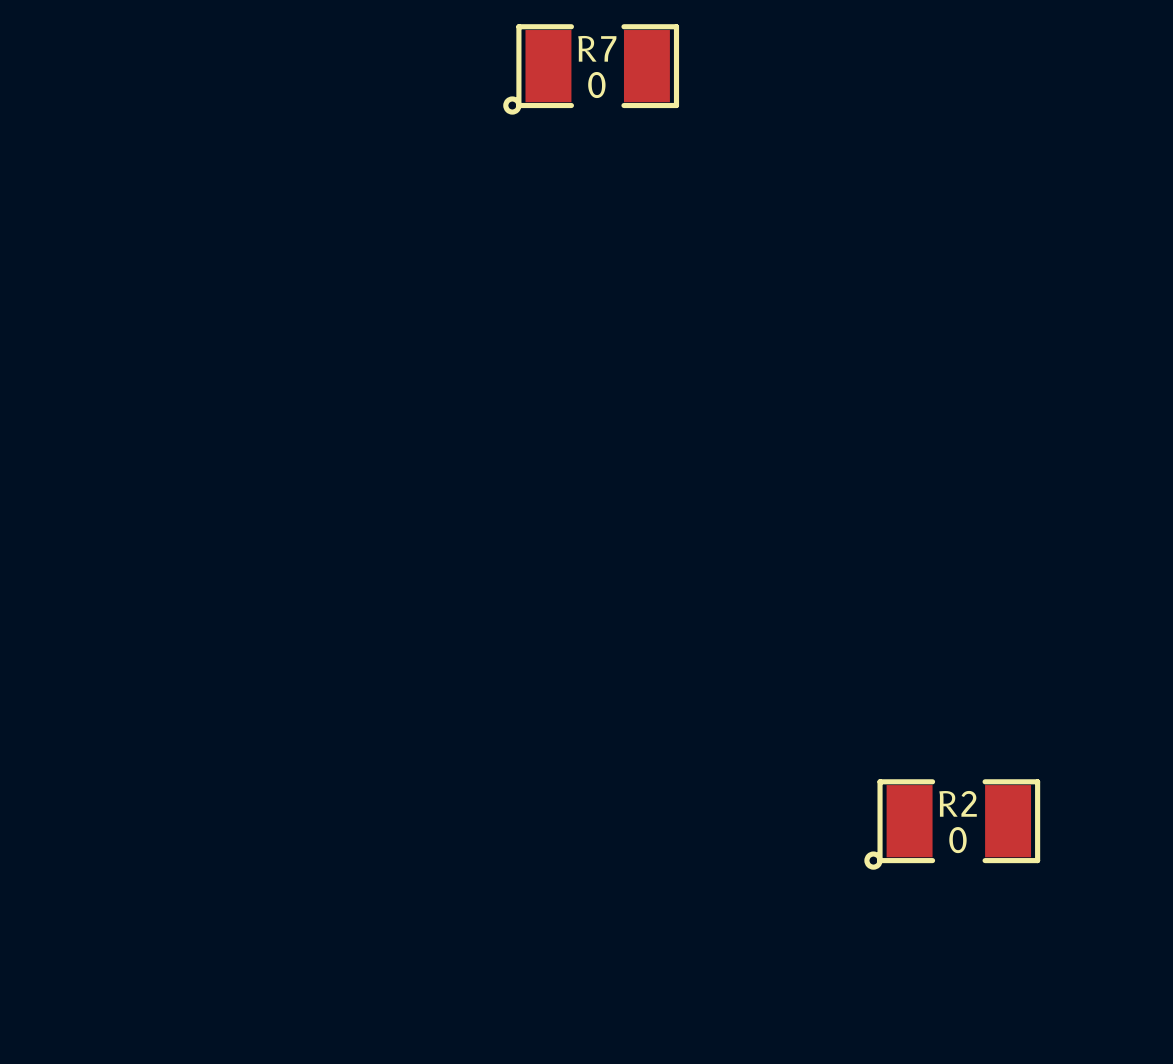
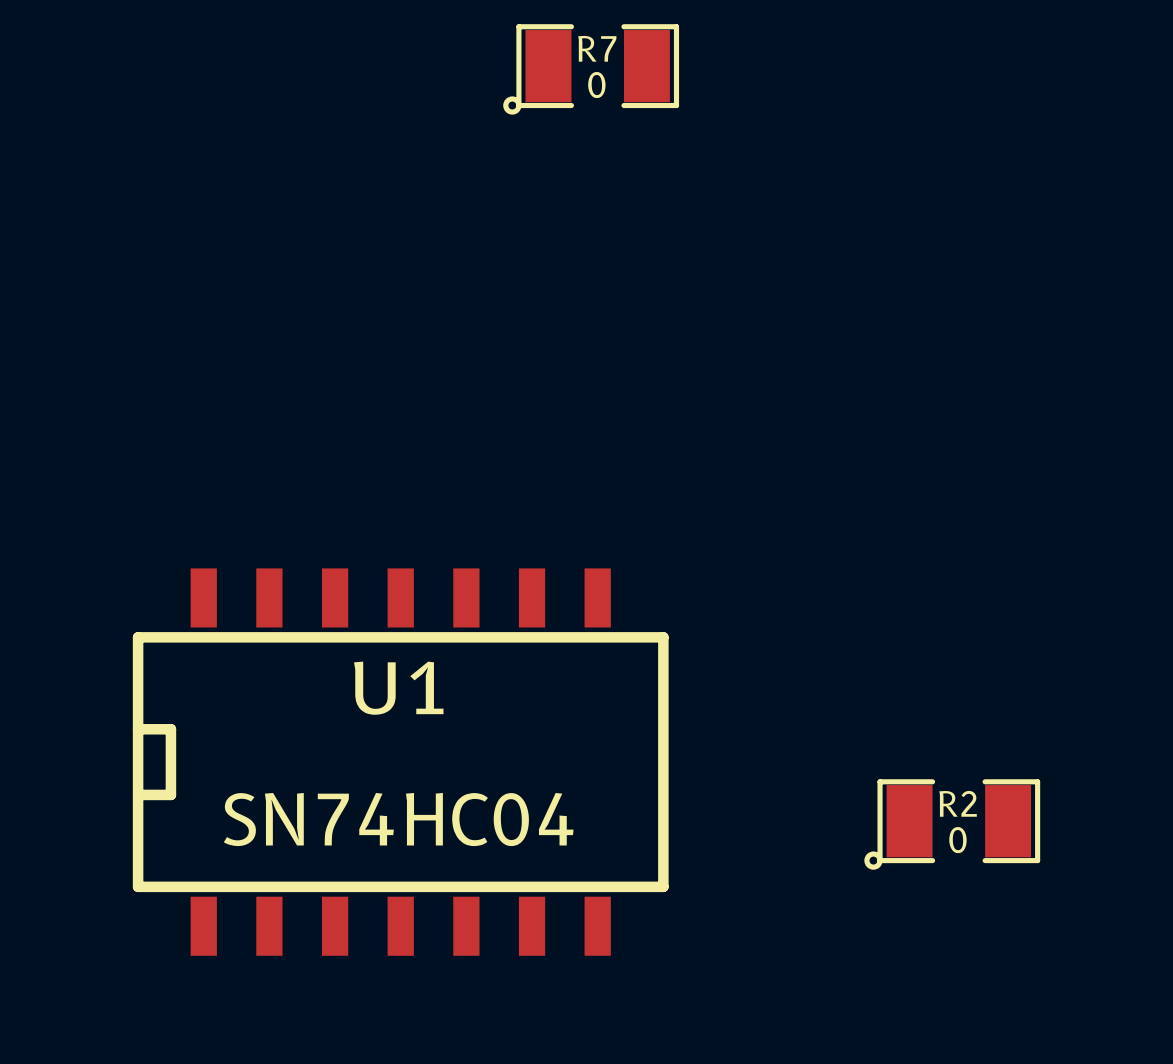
U1: none -> SN74HC04 (400, 762)

